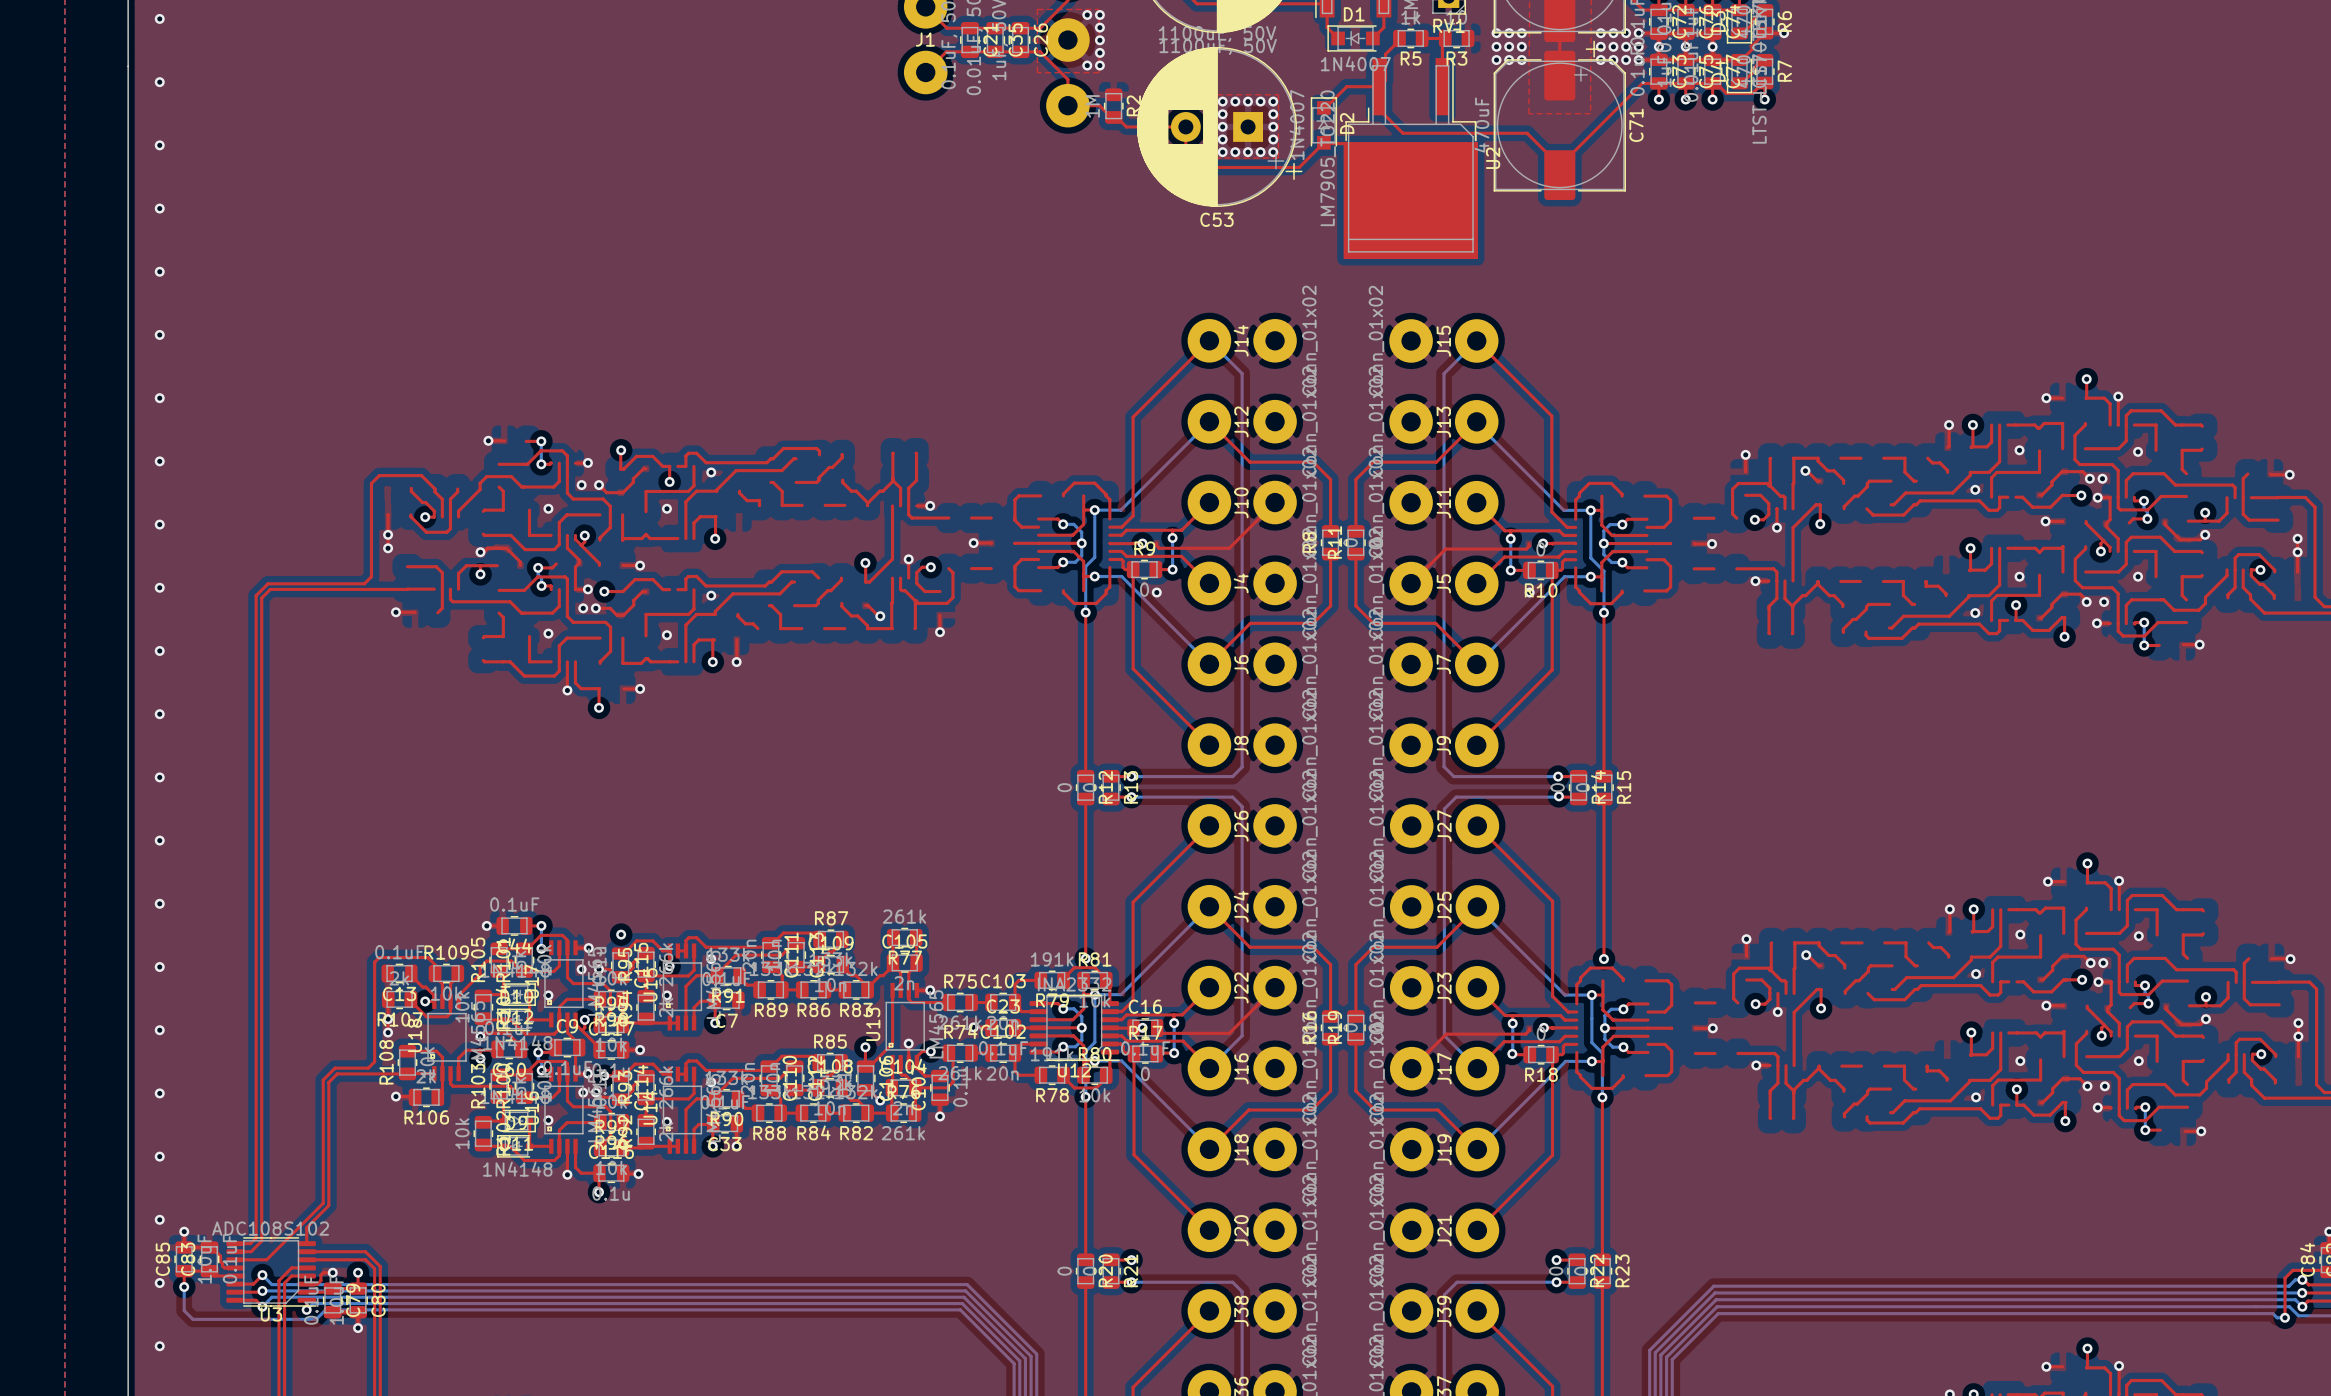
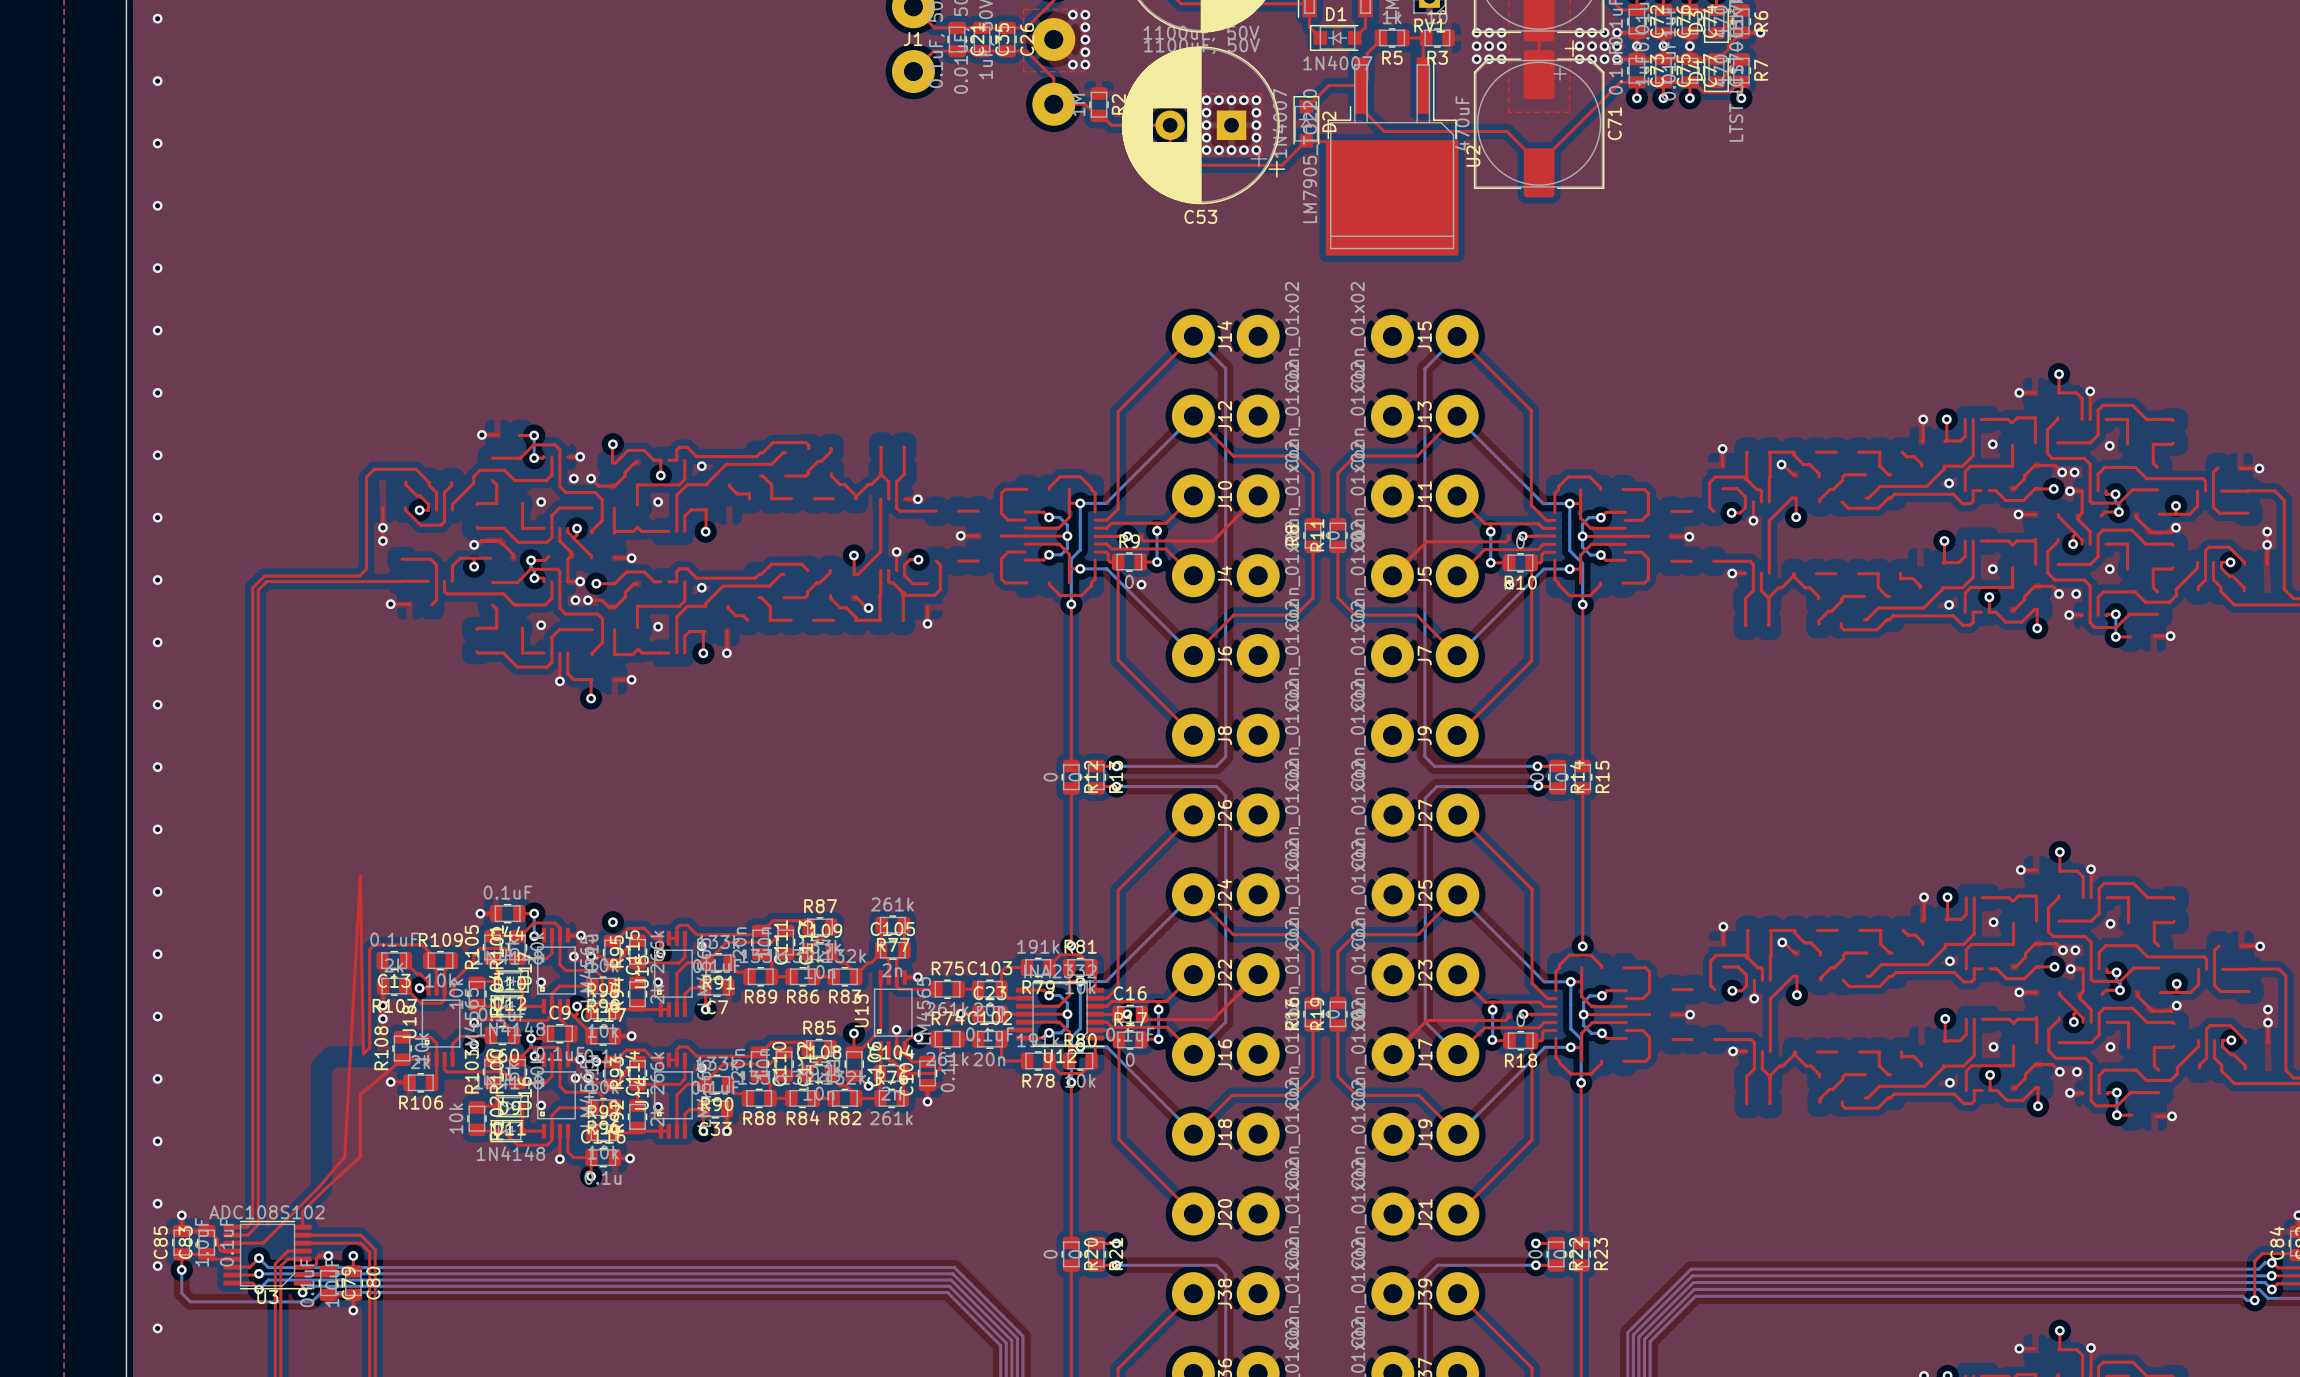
top track: (368, 1068) (335, 1068) (323, 1080) (323, 1203) -> (363, 1053) (360, 876) (344, 1156) (318, 1187)
top track: (407, 1073) (337, 1073) (328, 1082) (328, 1205) -> (402, 1059) (360, 1094) (360, 1156) (324, 1189)

